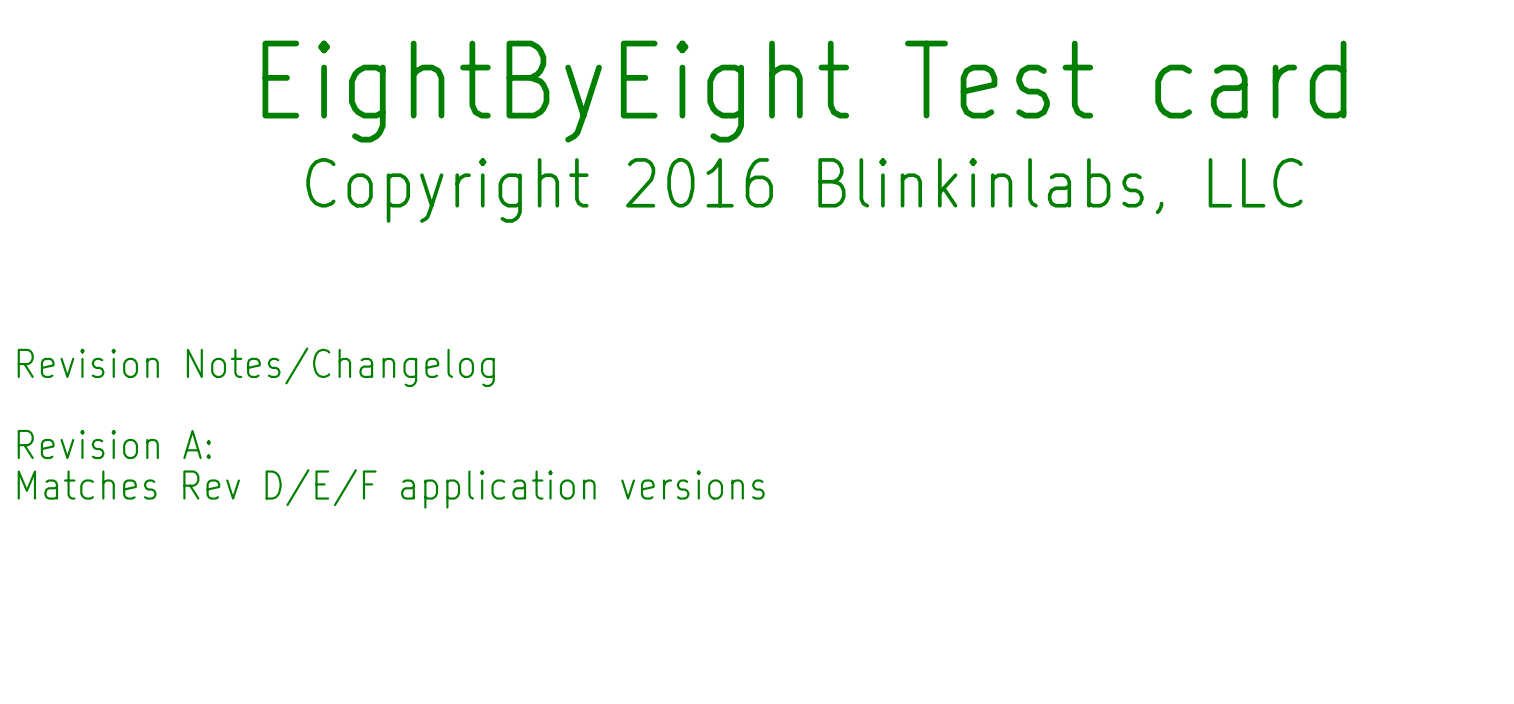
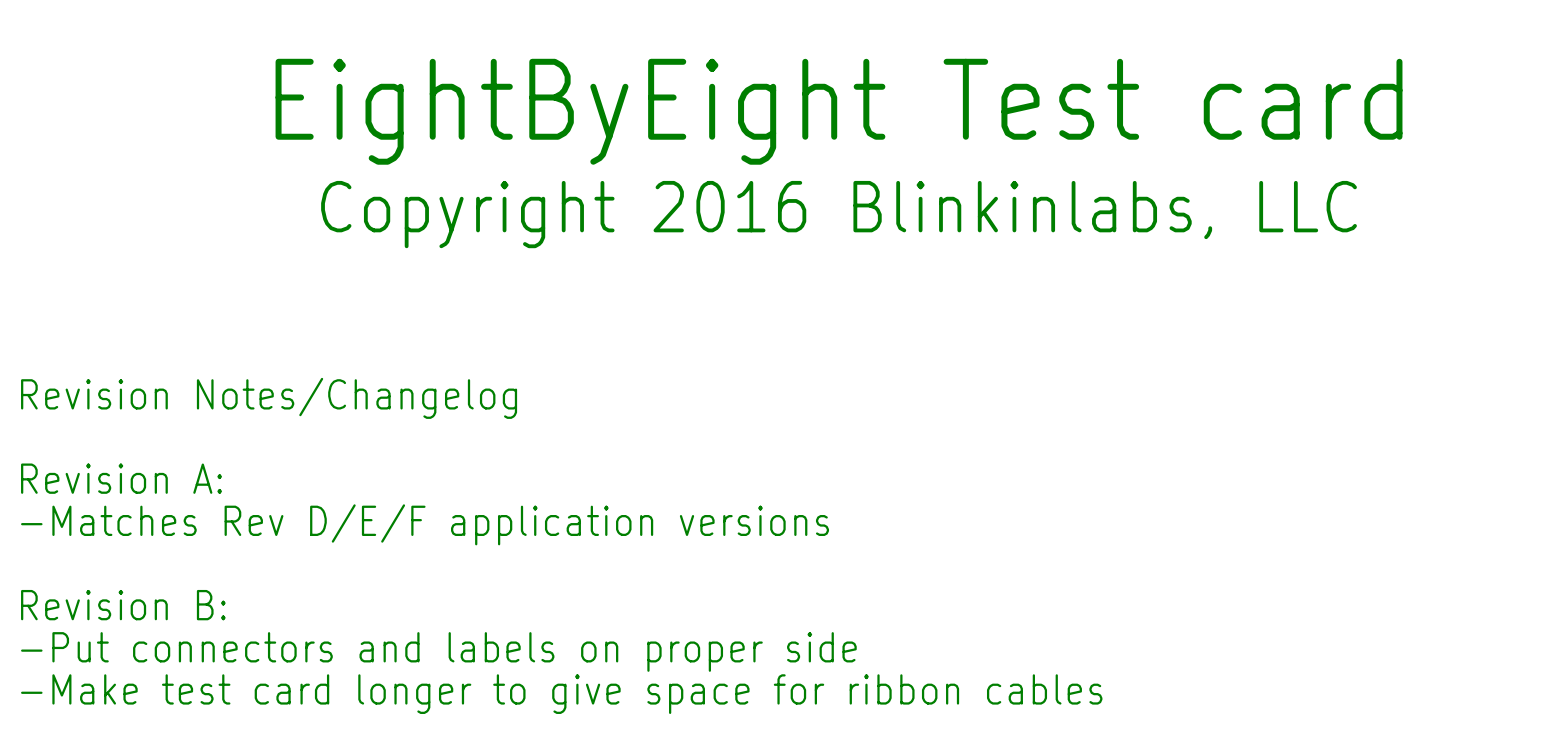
text: Matches Rev D/E/F application versions (391, 488) -> -Matches Rev D/E/F application versions (425, 524)
text: none -> Revision B: (123, 605)
text: none -> -Put connectors and labels on proper side (438, 651)
text: none -> -Make test card longer to give space for ribbon cables (561, 694)

